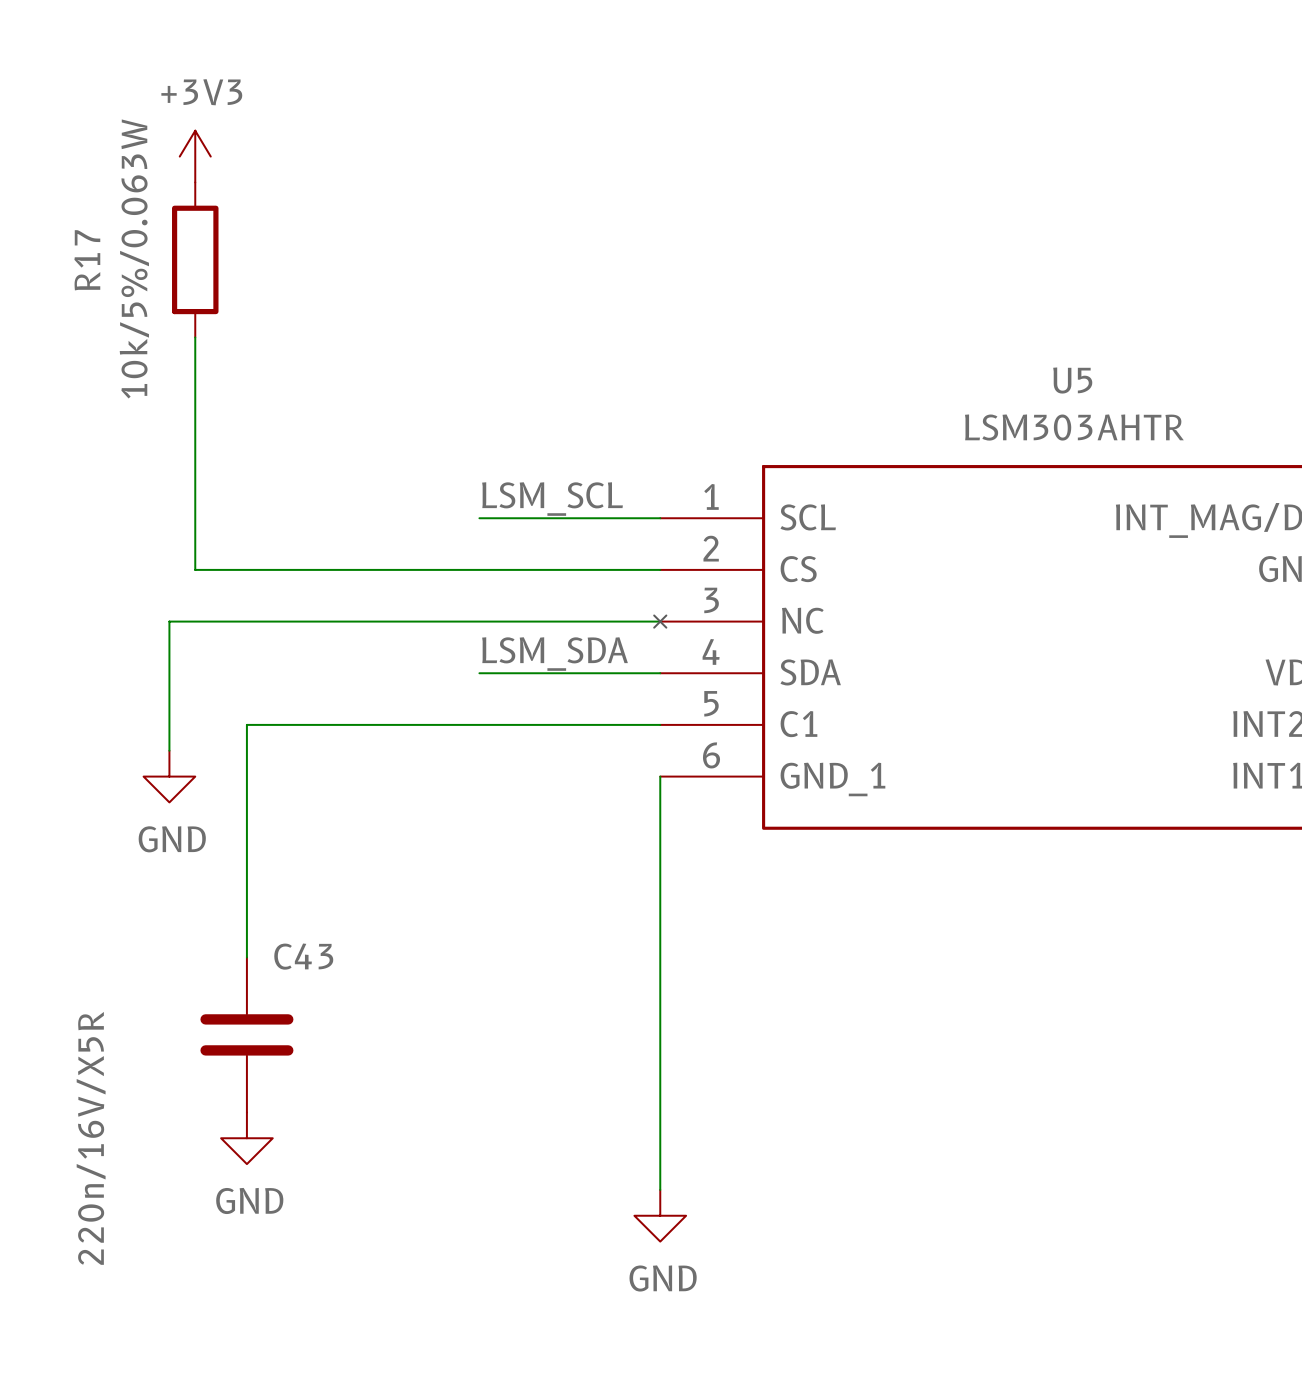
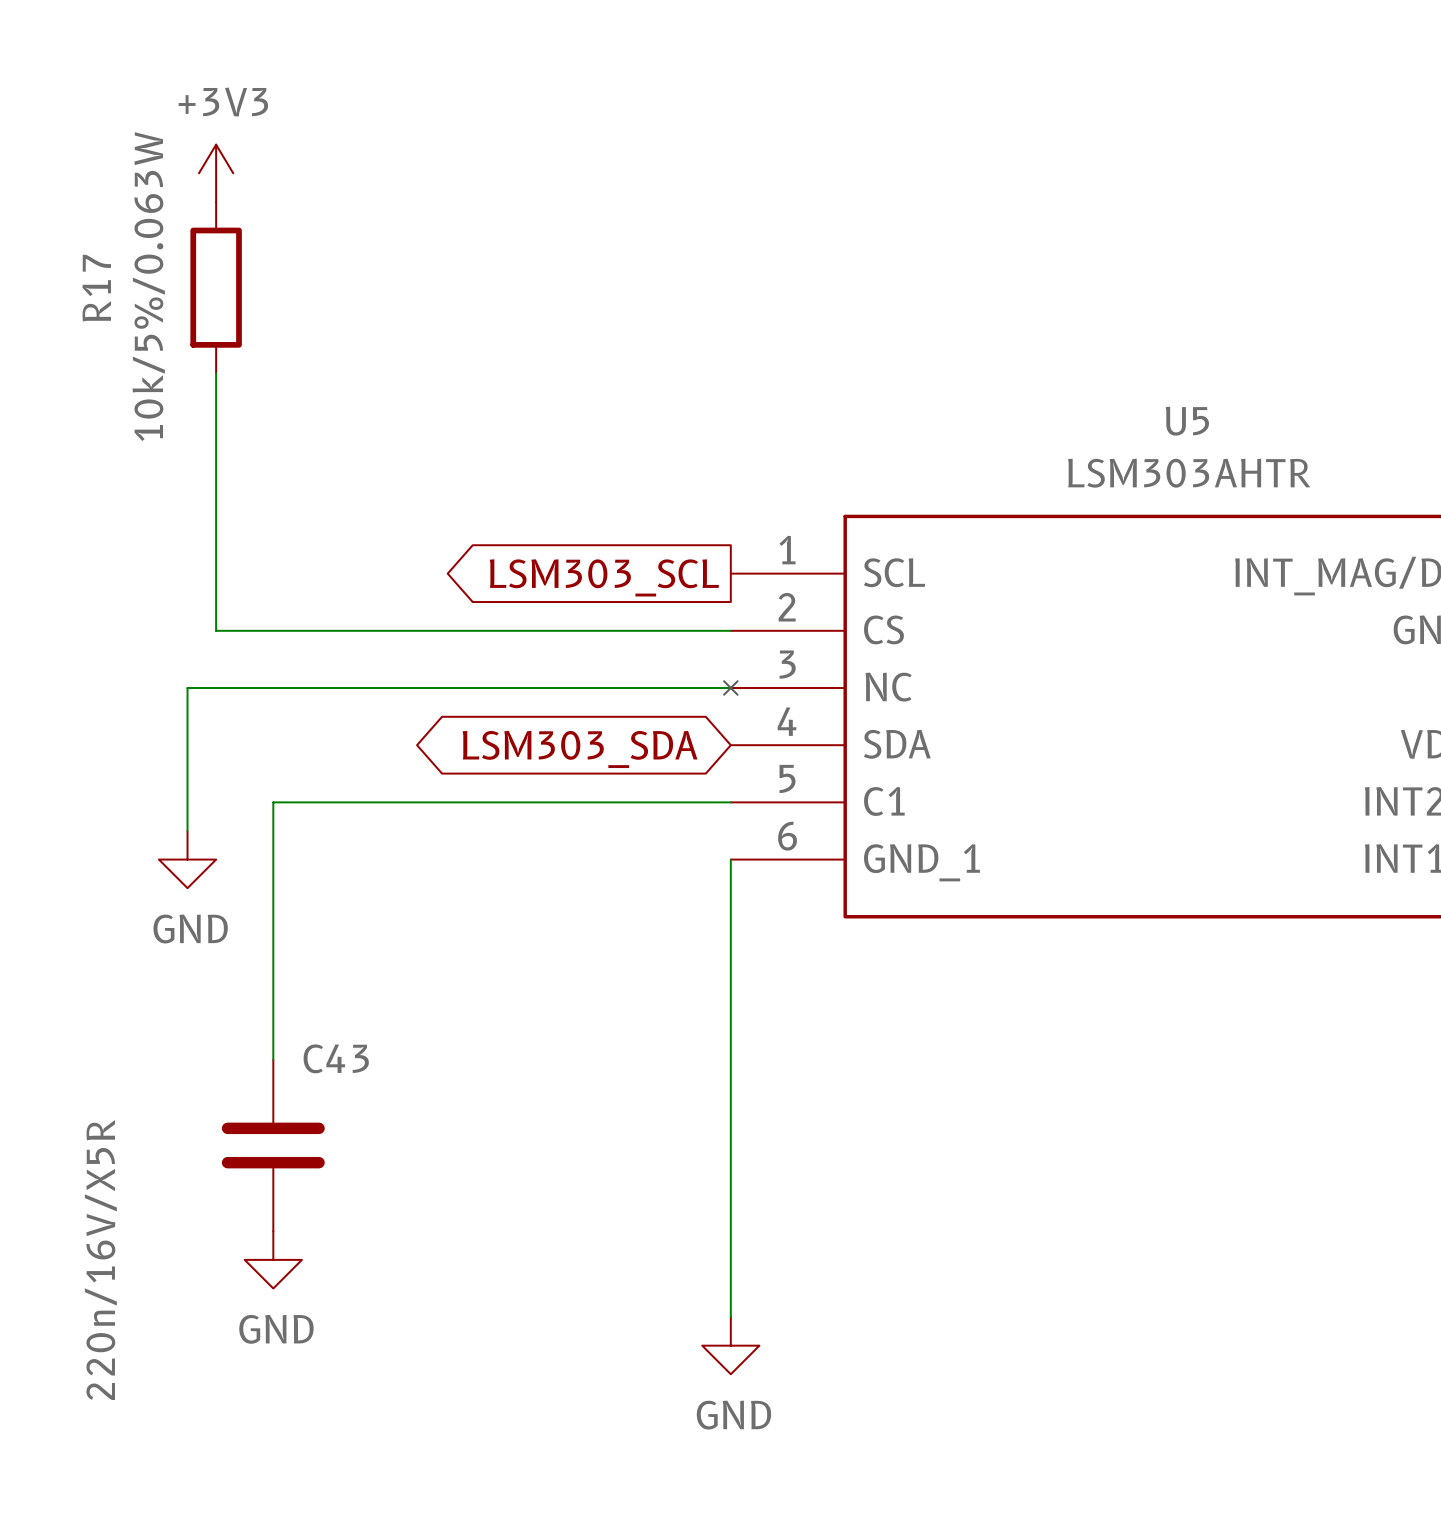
label: LSM_SCL (552, 499) -> none
wire: (479, 518) (660, 518) -> none
global label: none -> LSM303_SCL (604, 577)
label: LSM_SDA (555, 654) -> none
wire: (479, 673) (660, 673) -> none
global label: none -> LSM303_SDA (580, 749)

